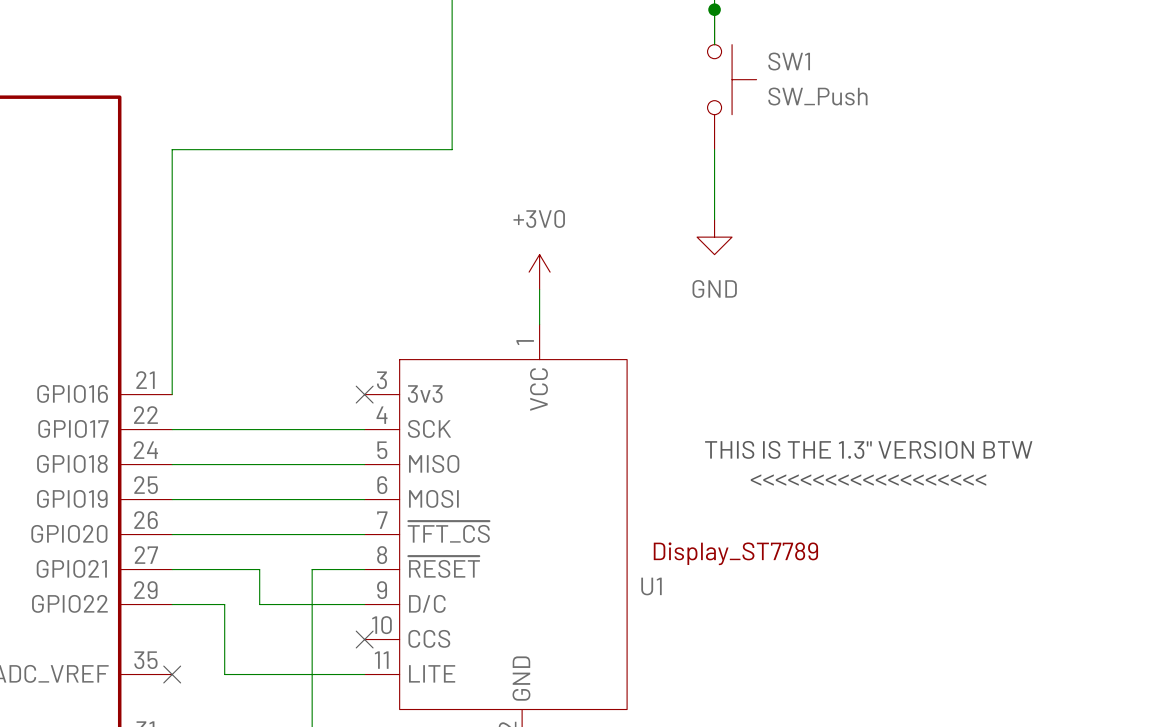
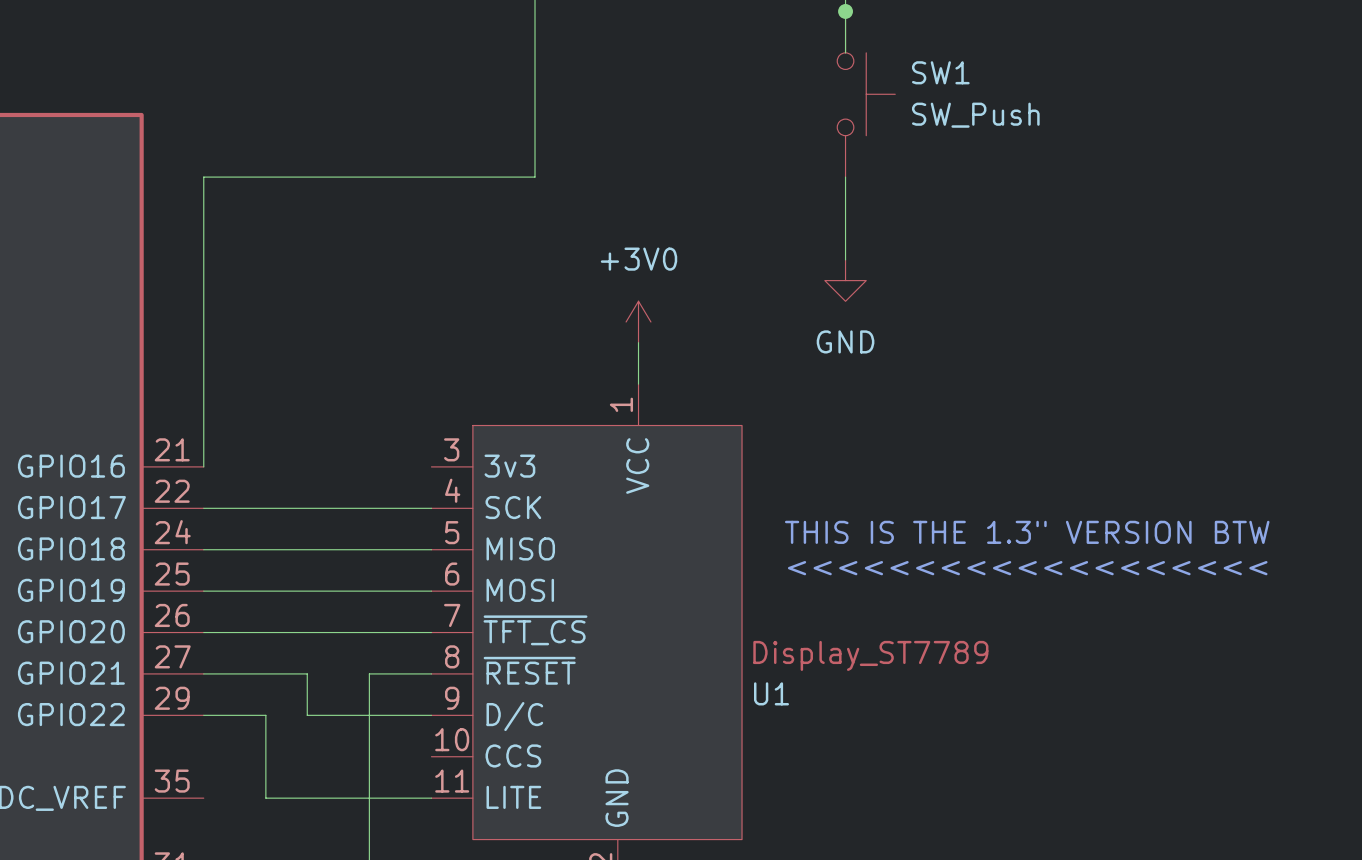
no-connect mark: (364, 394) -> none
no-connect mark: (364, 639) -> none
no-connect mark: (172, 674) -> none

